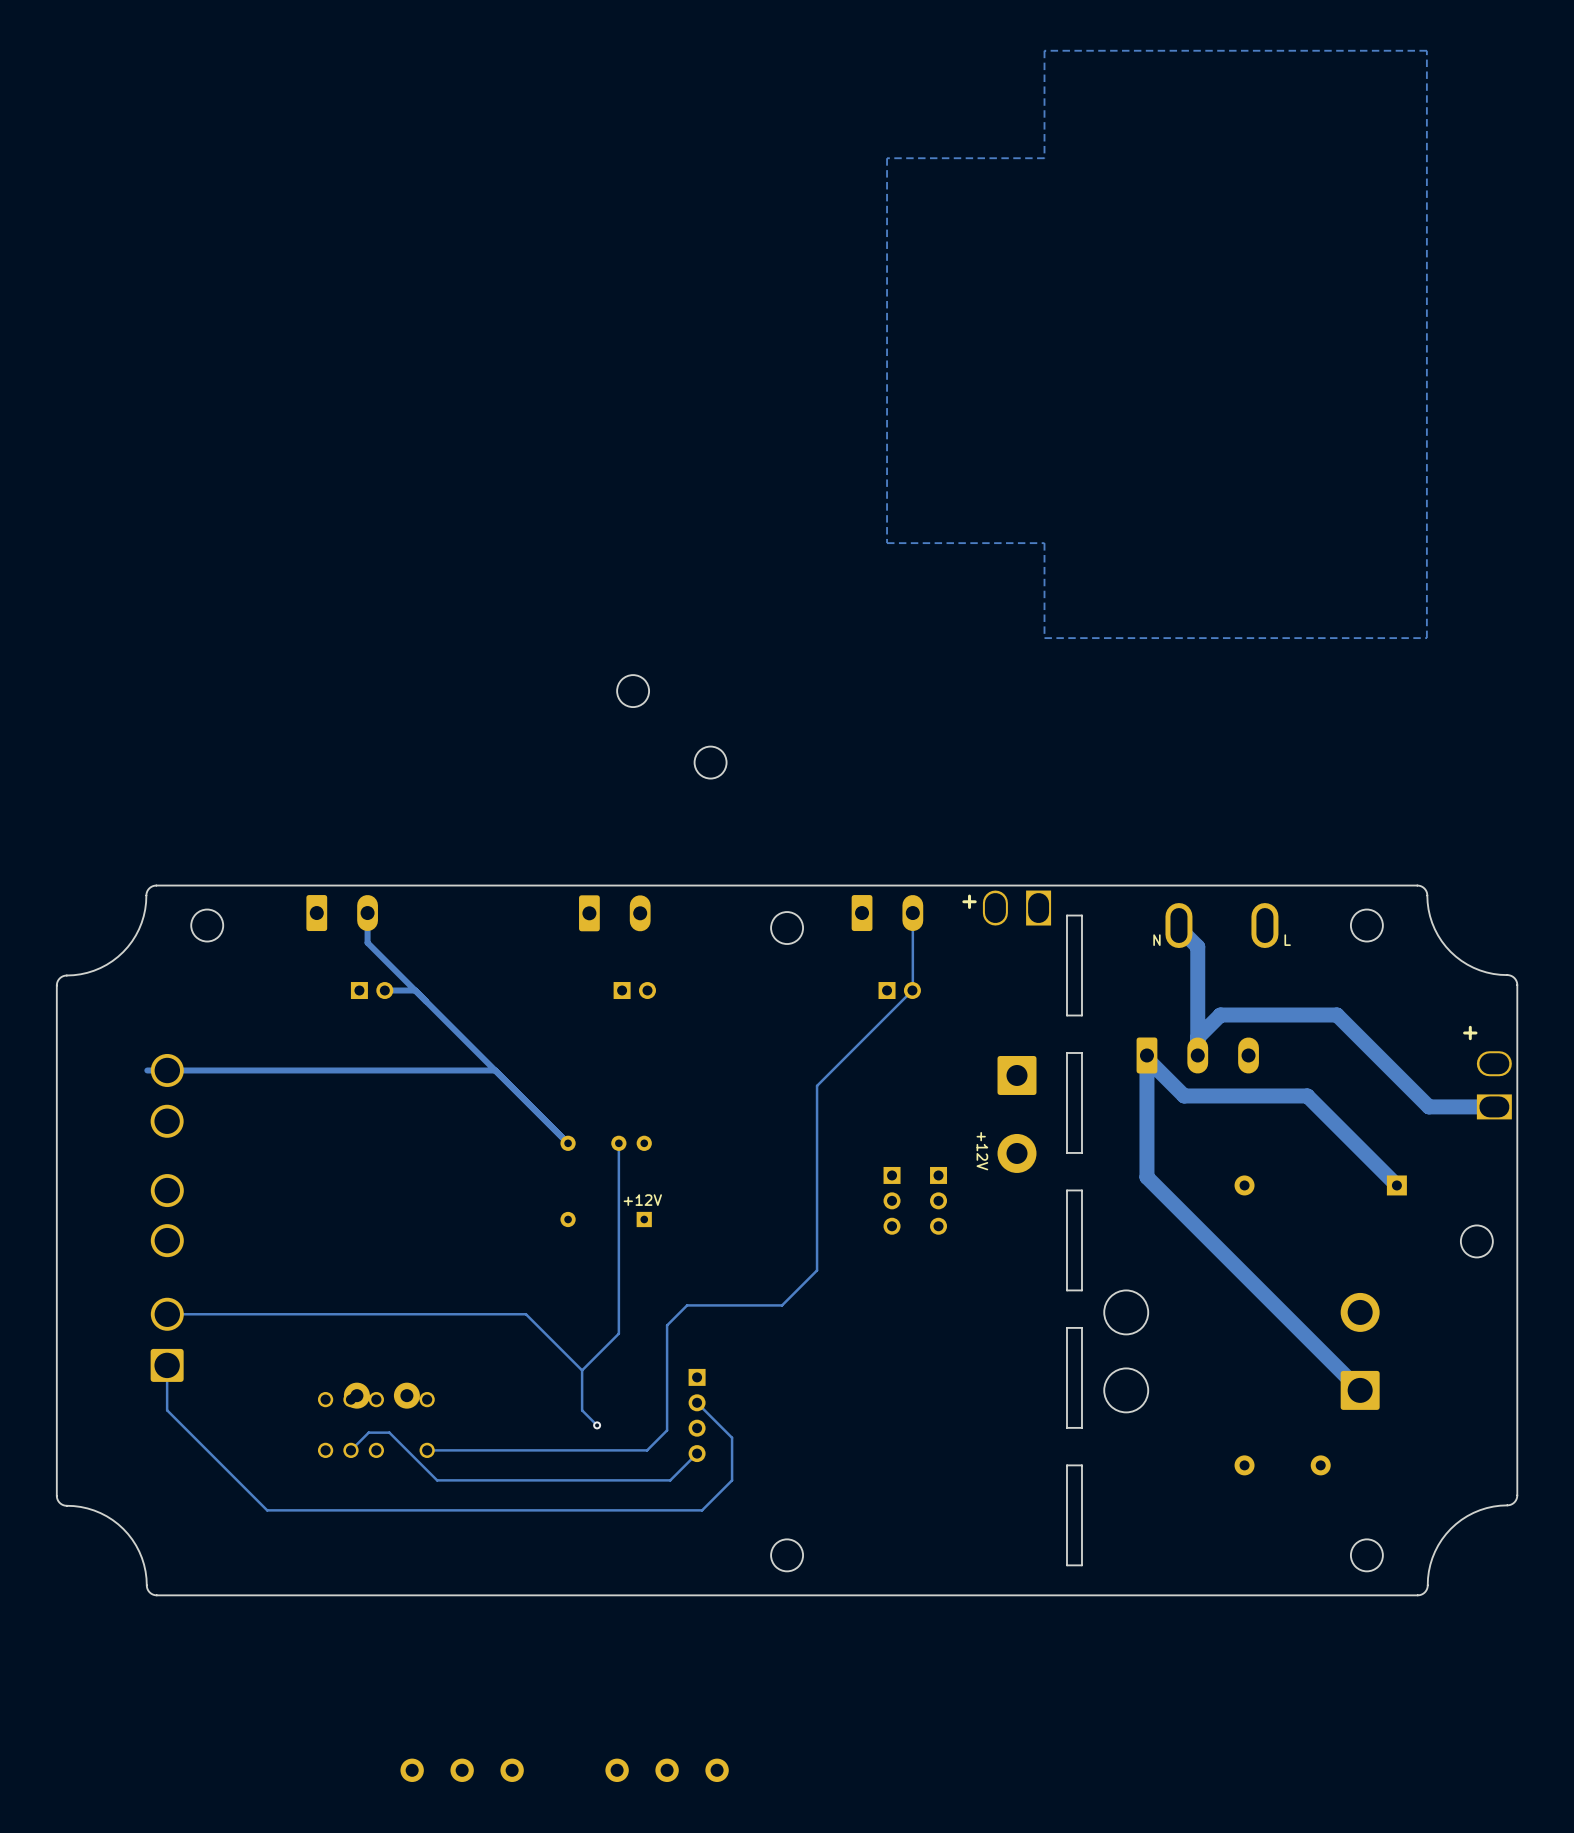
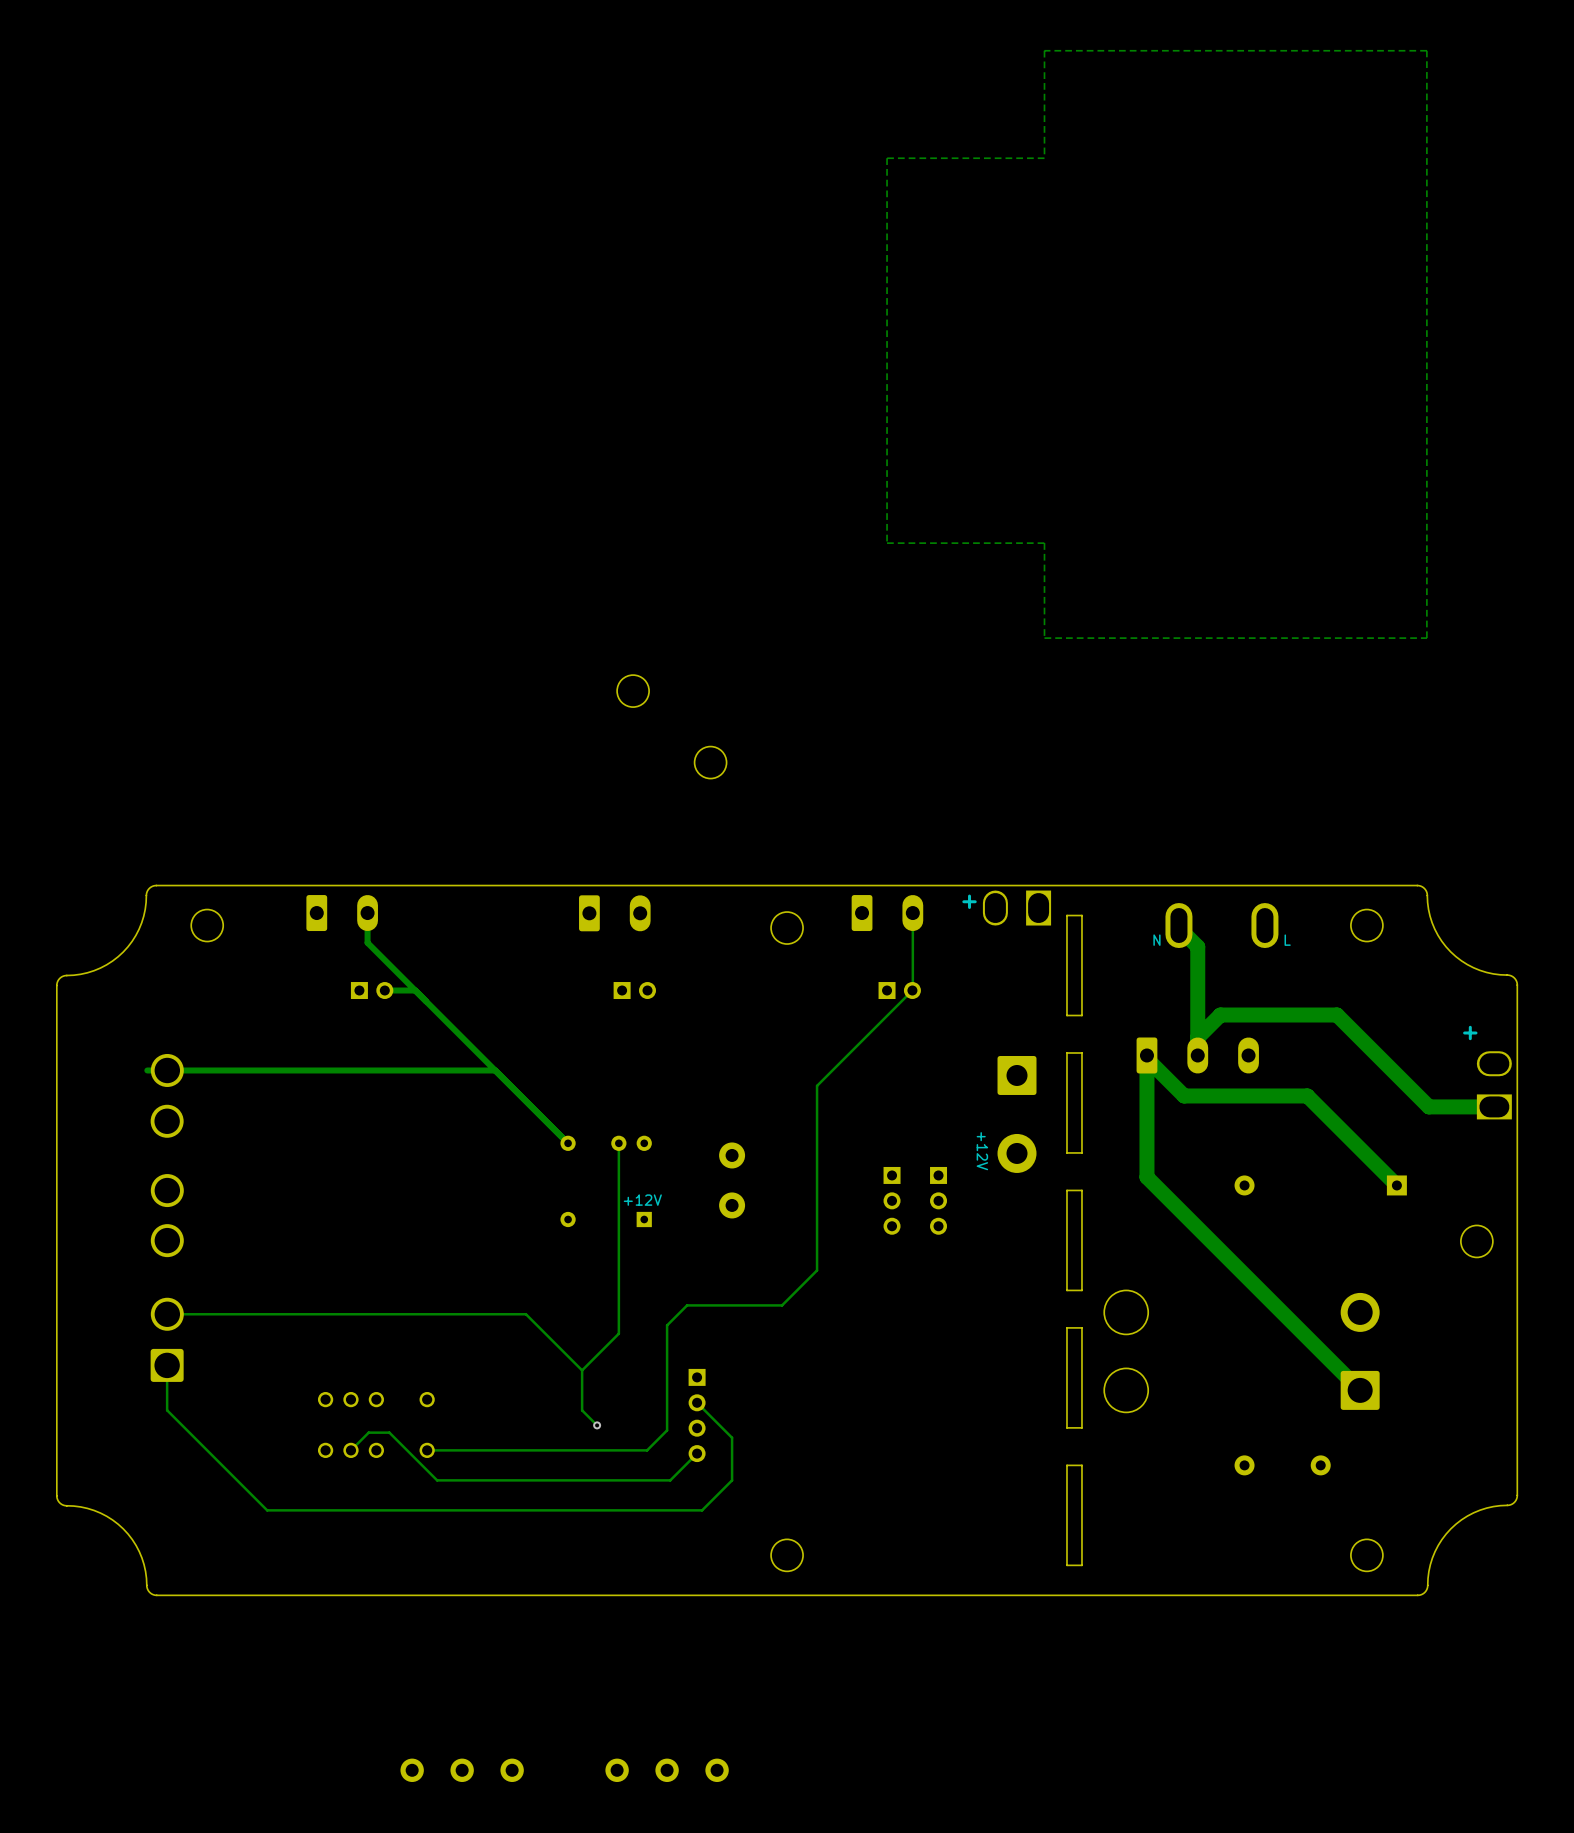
part: none -> (732, 1180)
part: (381, 1395) -> none

